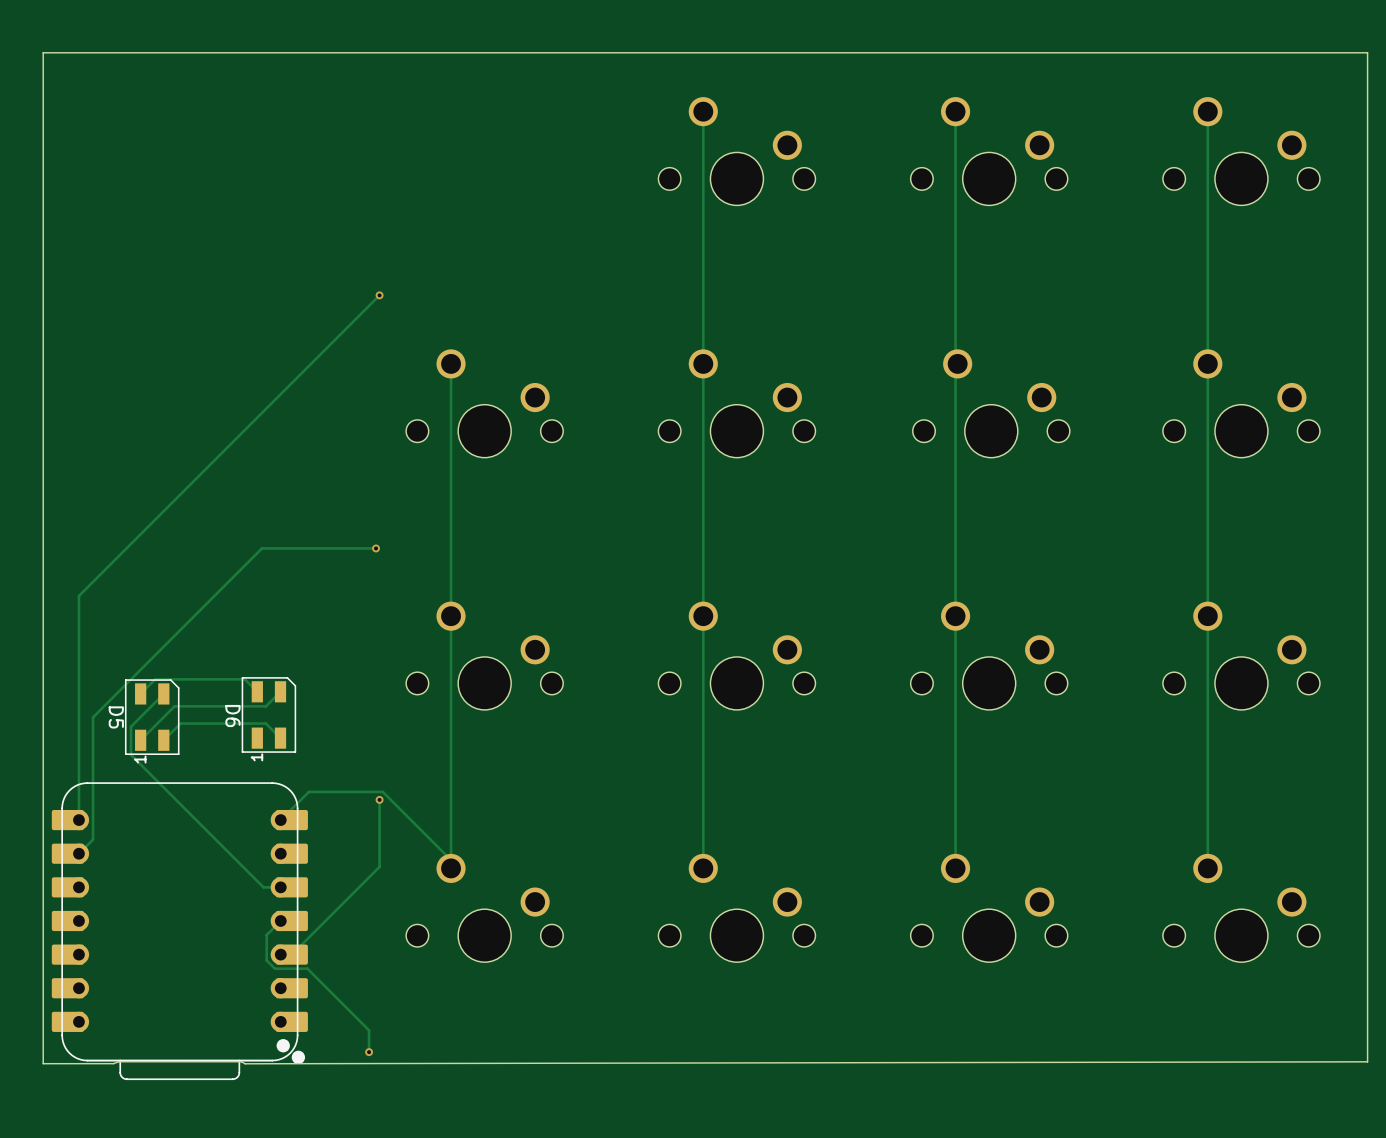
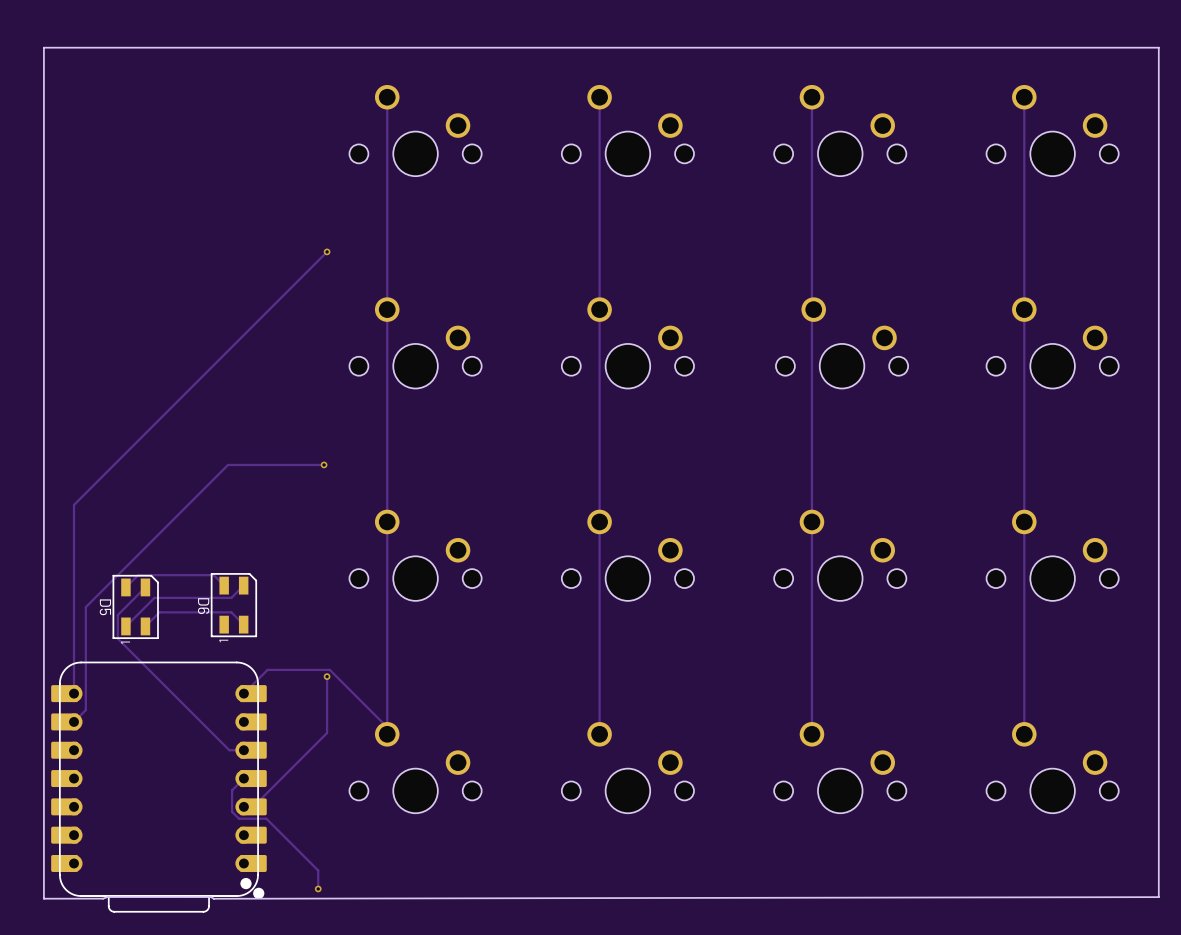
track: none -> (387, 97) (387, 309)
part: none -> (415, 130)

